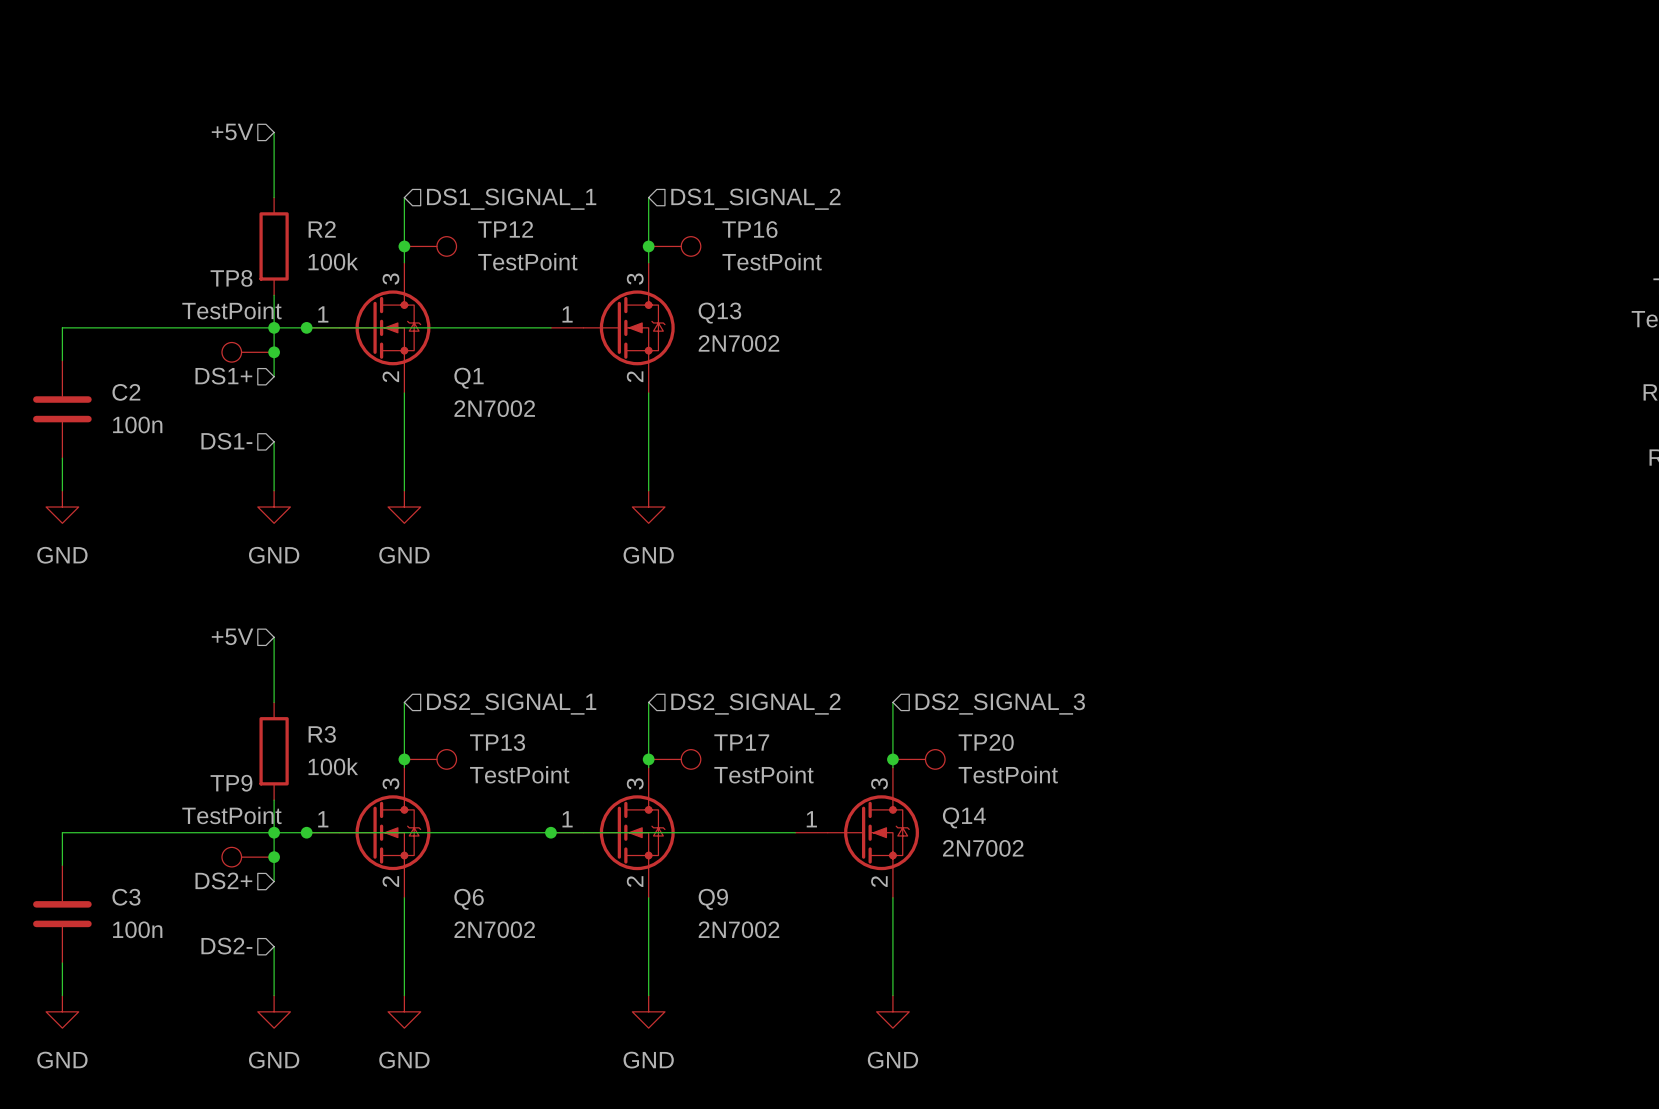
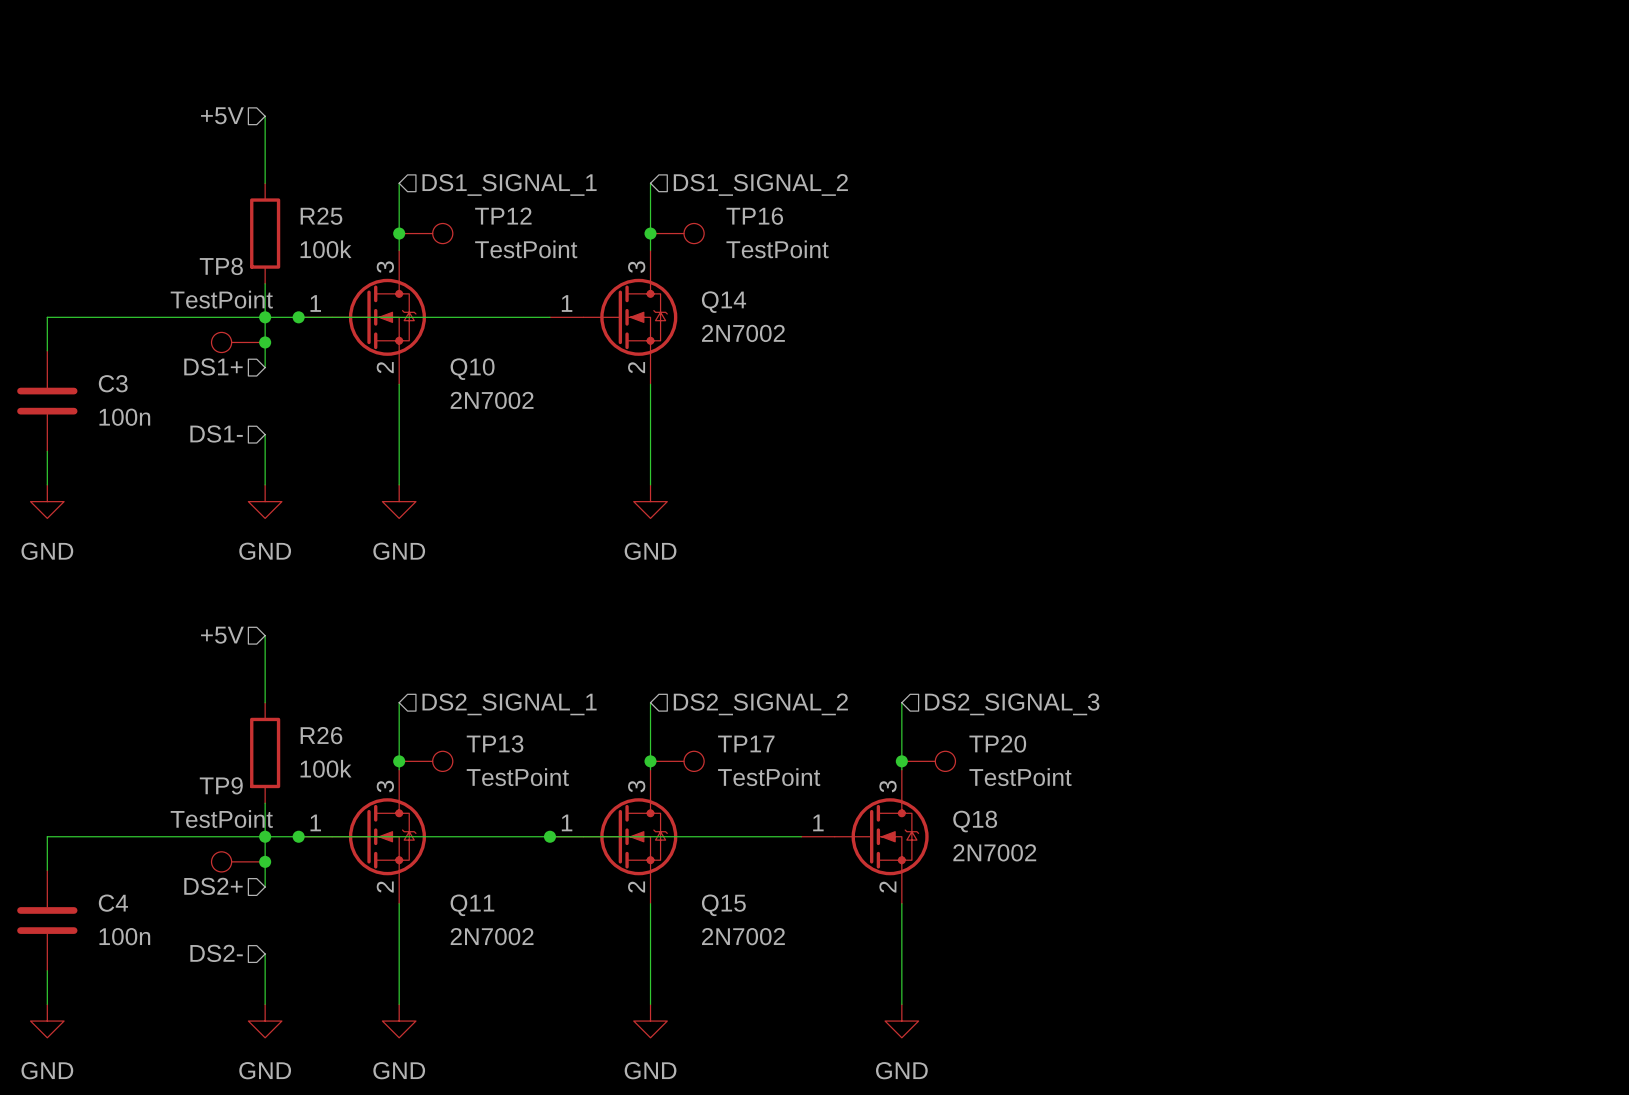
R2 name: R2 (322, 229) -> R25 (321, 216)
Q13 name: Q13 (719, 313) -> Q14 (724, 302)
Q1 name: Q1 (469, 378) -> Q10 (472, 369)
C2 name: C2 (126, 392) -> C3 (113, 383)
R3 name: R3 (322, 734) -> R26 (321, 735)
Q14 name: Q14 (964, 817) -> Q18 (975, 821)
C3 name: C3 (126, 897) -> C4 (113, 903)
Q6 name: Q6 (469, 899) -> Q11 (472, 905)
Q9 name: Q9 (713, 899) -> Q15 (723, 905)

